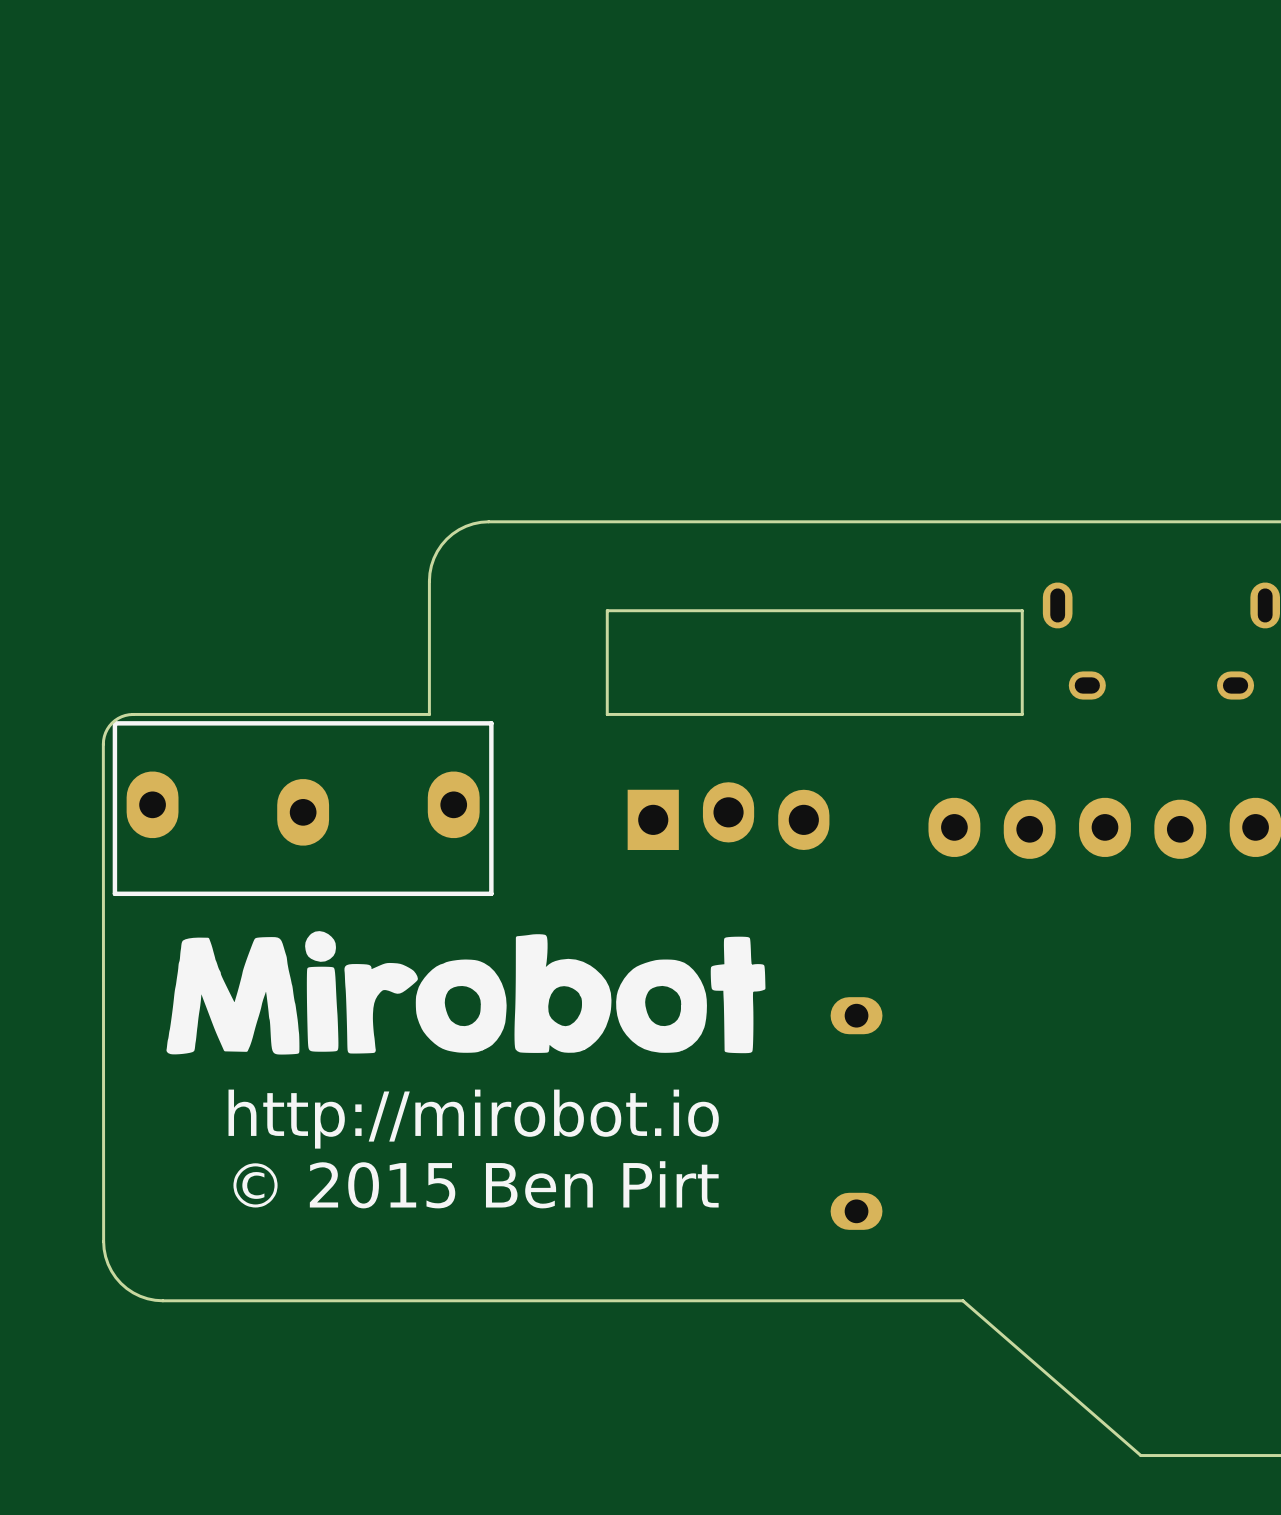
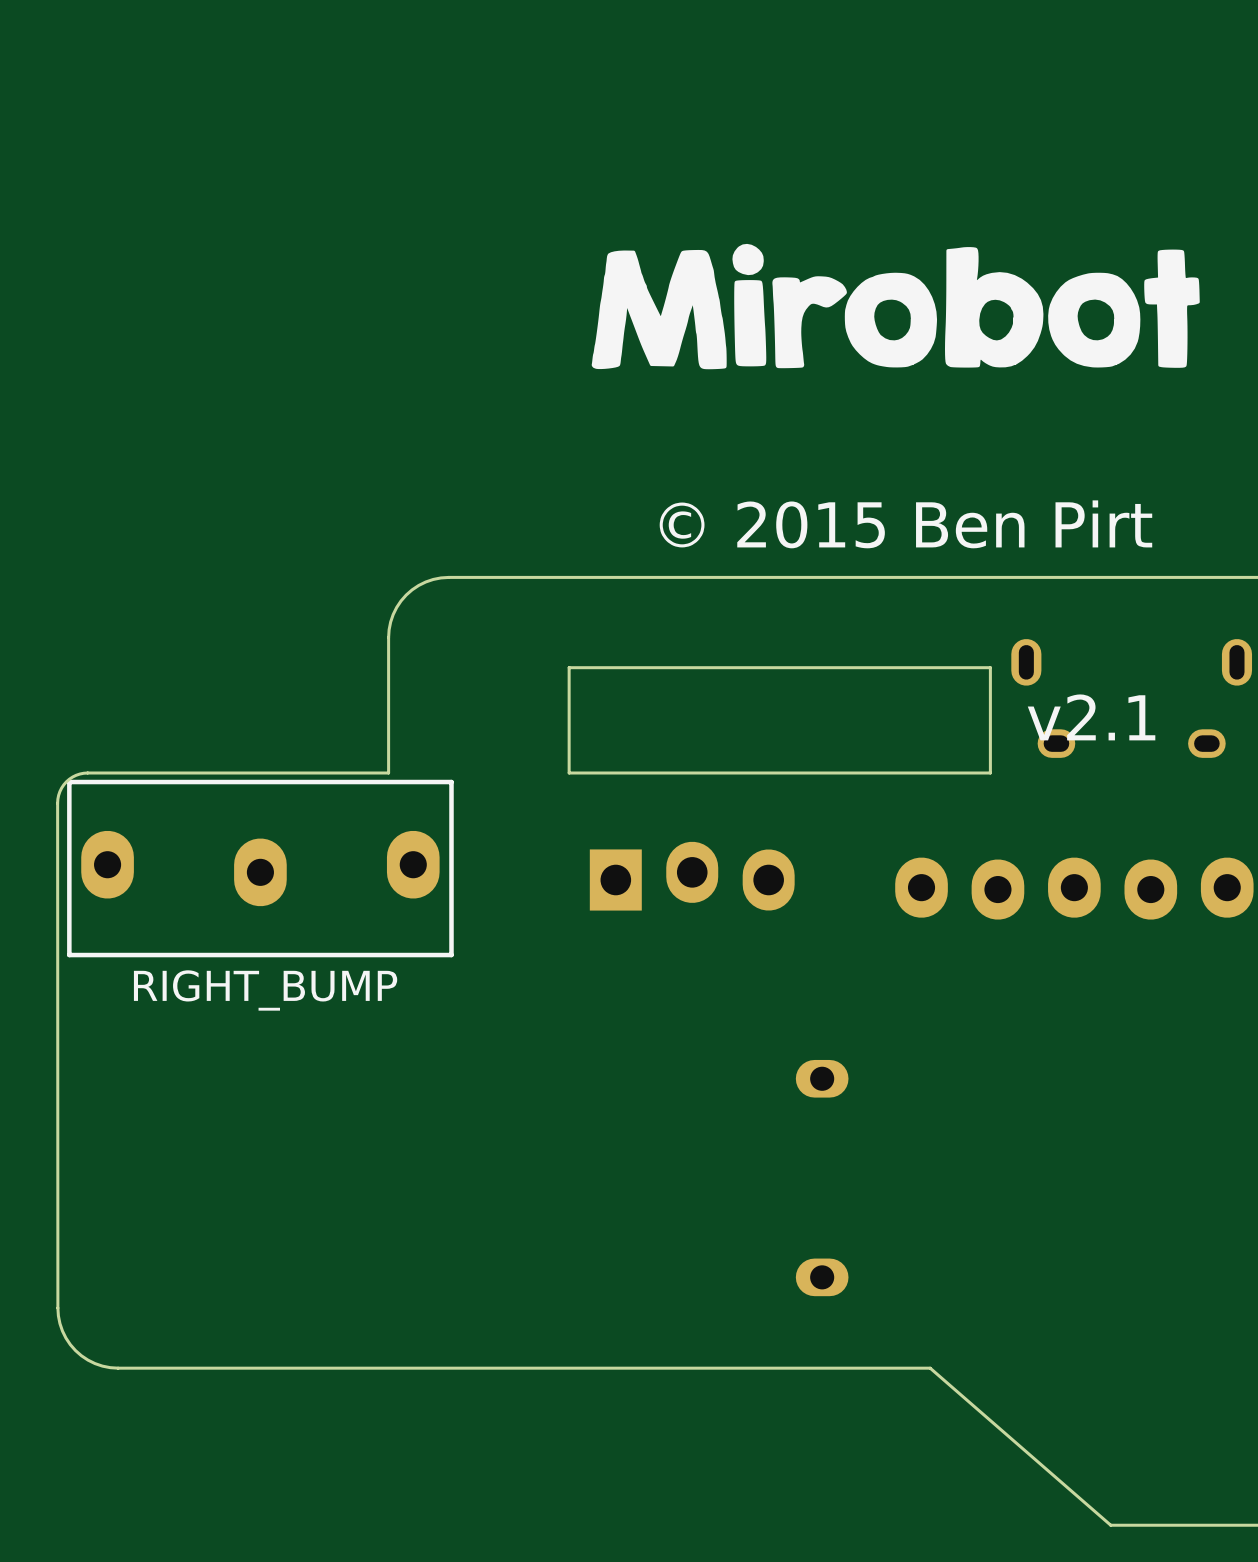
drawing: none -> [591, 243, 1200, 370]
text: none -> © 2015 Ben Pirt (905, 524)
text: none -> v2.1 (1091, 717)
part value: none -> RIGHT_BUMP (265, 990)
drawing: [166, 931, 766, 1055] -> none
text: http://mirobot.io (473, 1119) -> none
text: © 2015 Ben Pirt (476, 1184) -> none

